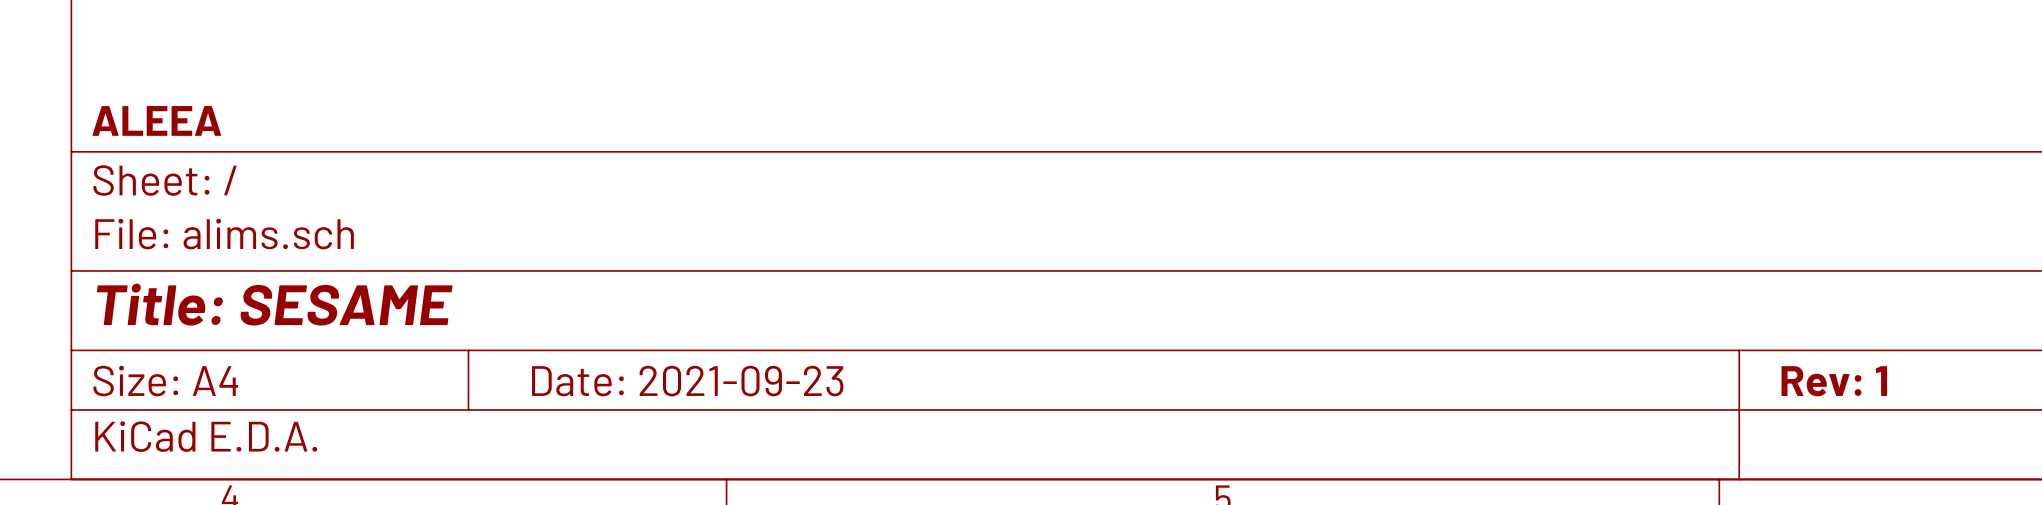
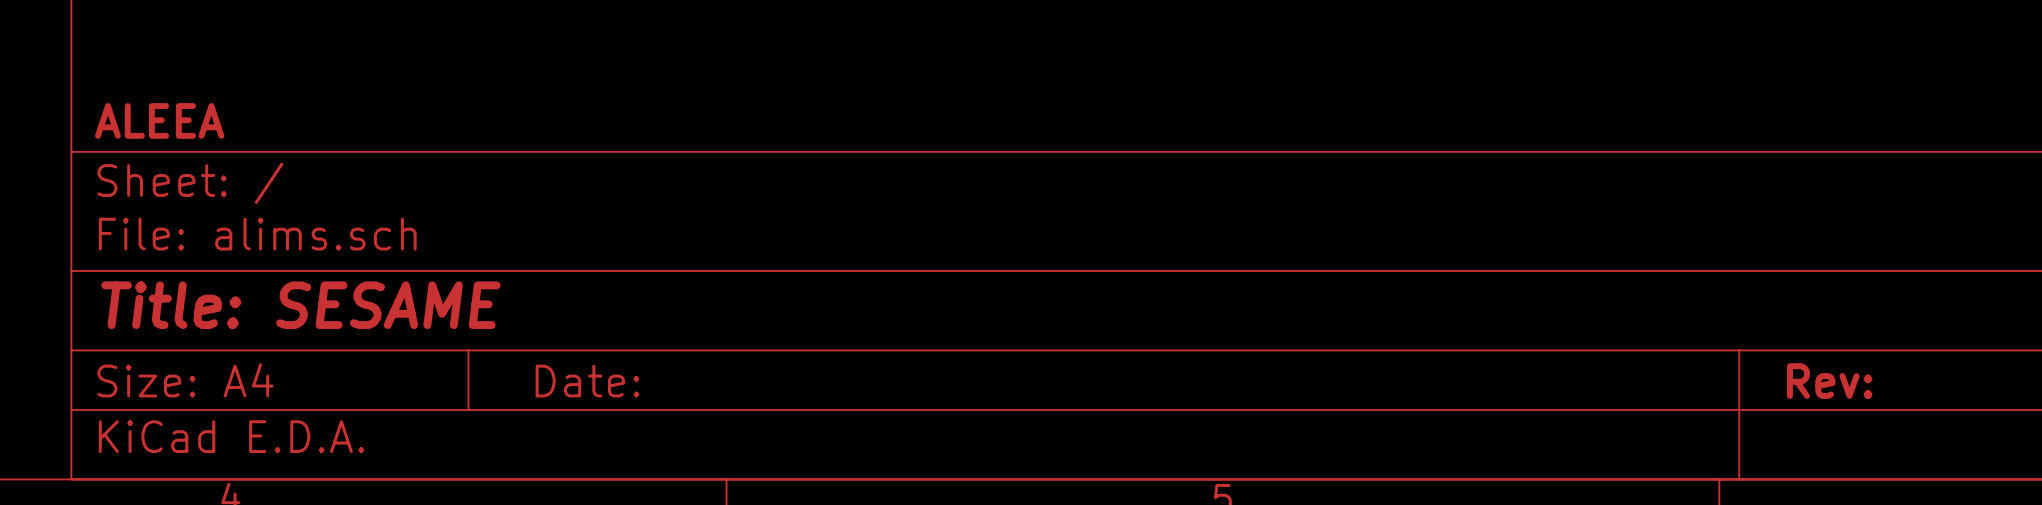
title block: Date: 2021-09-23 (687, 381) -> Date: (587, 381)
title block: Rev: 1 (1834, 381) -> Rev: (1829, 381)

